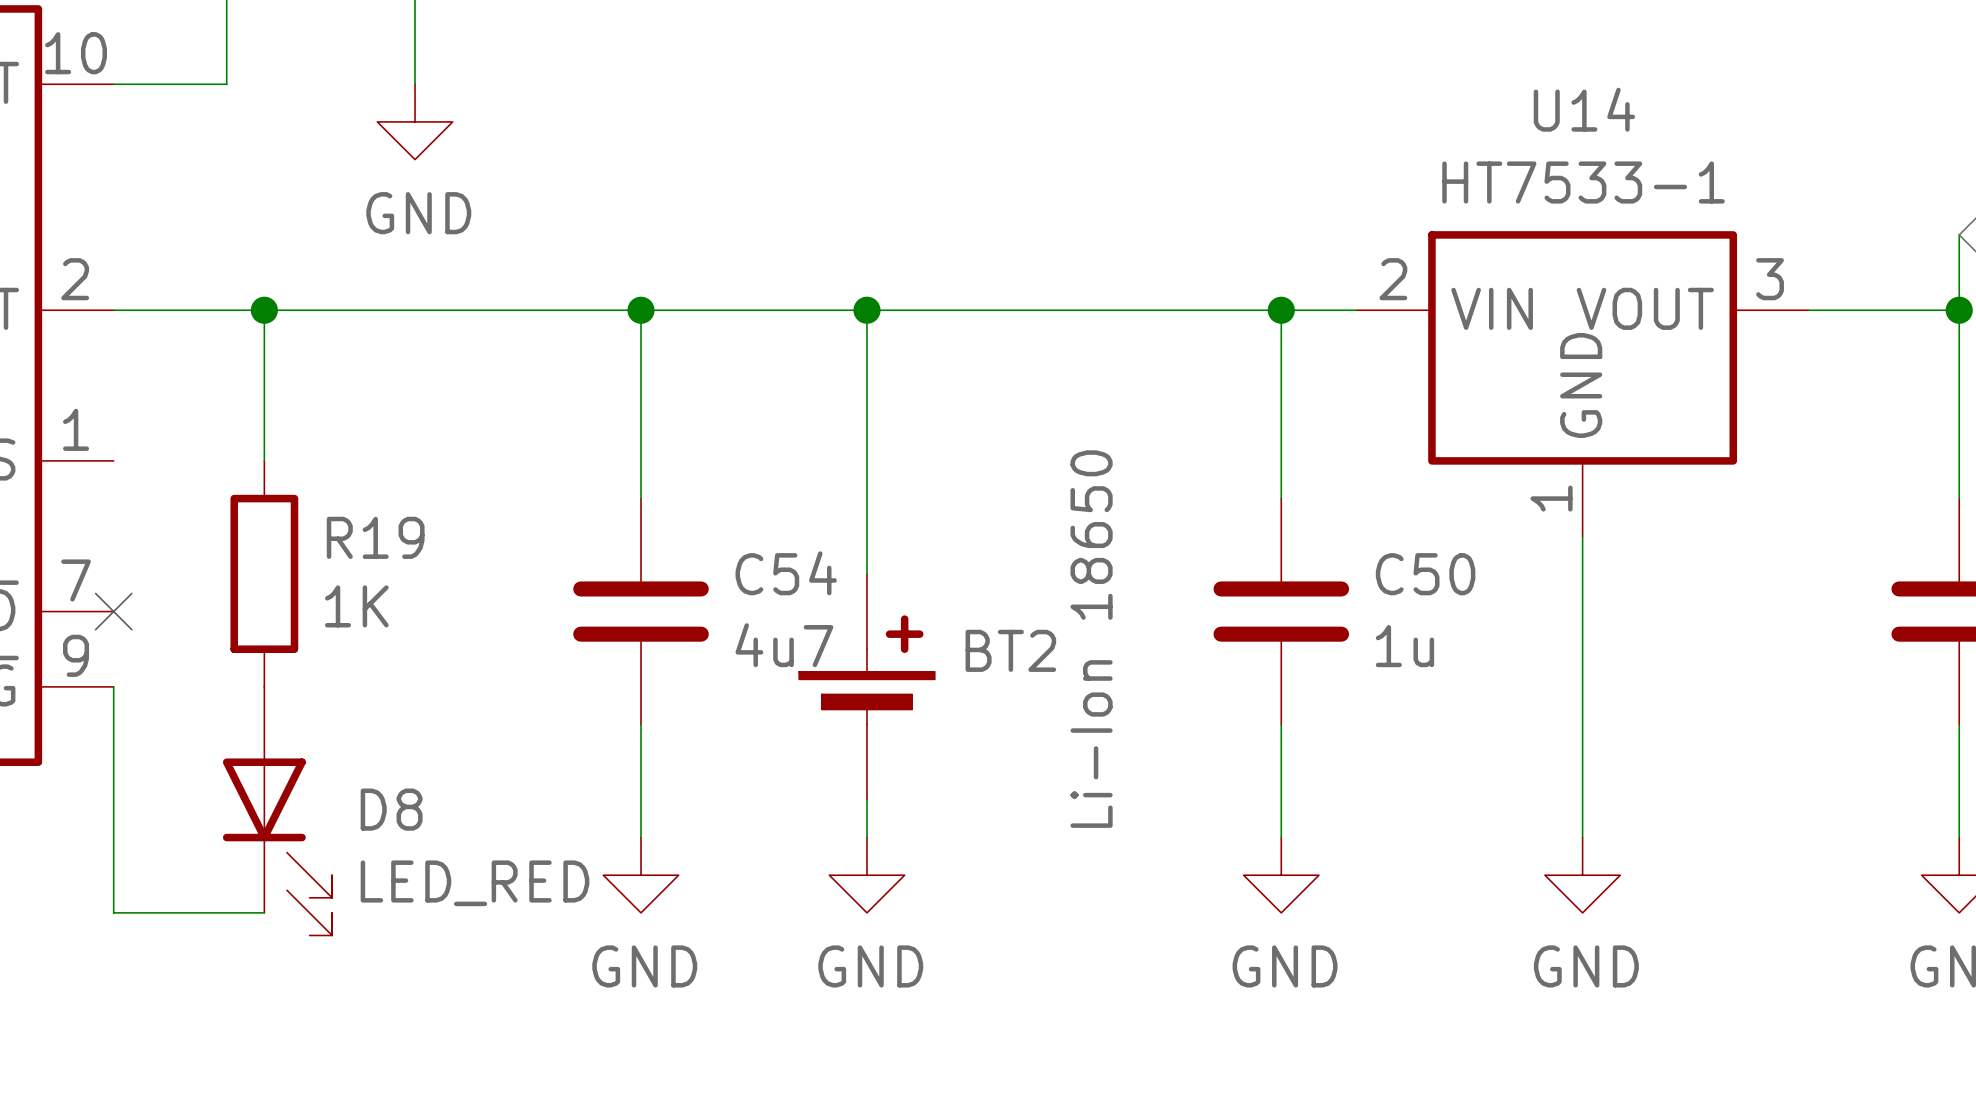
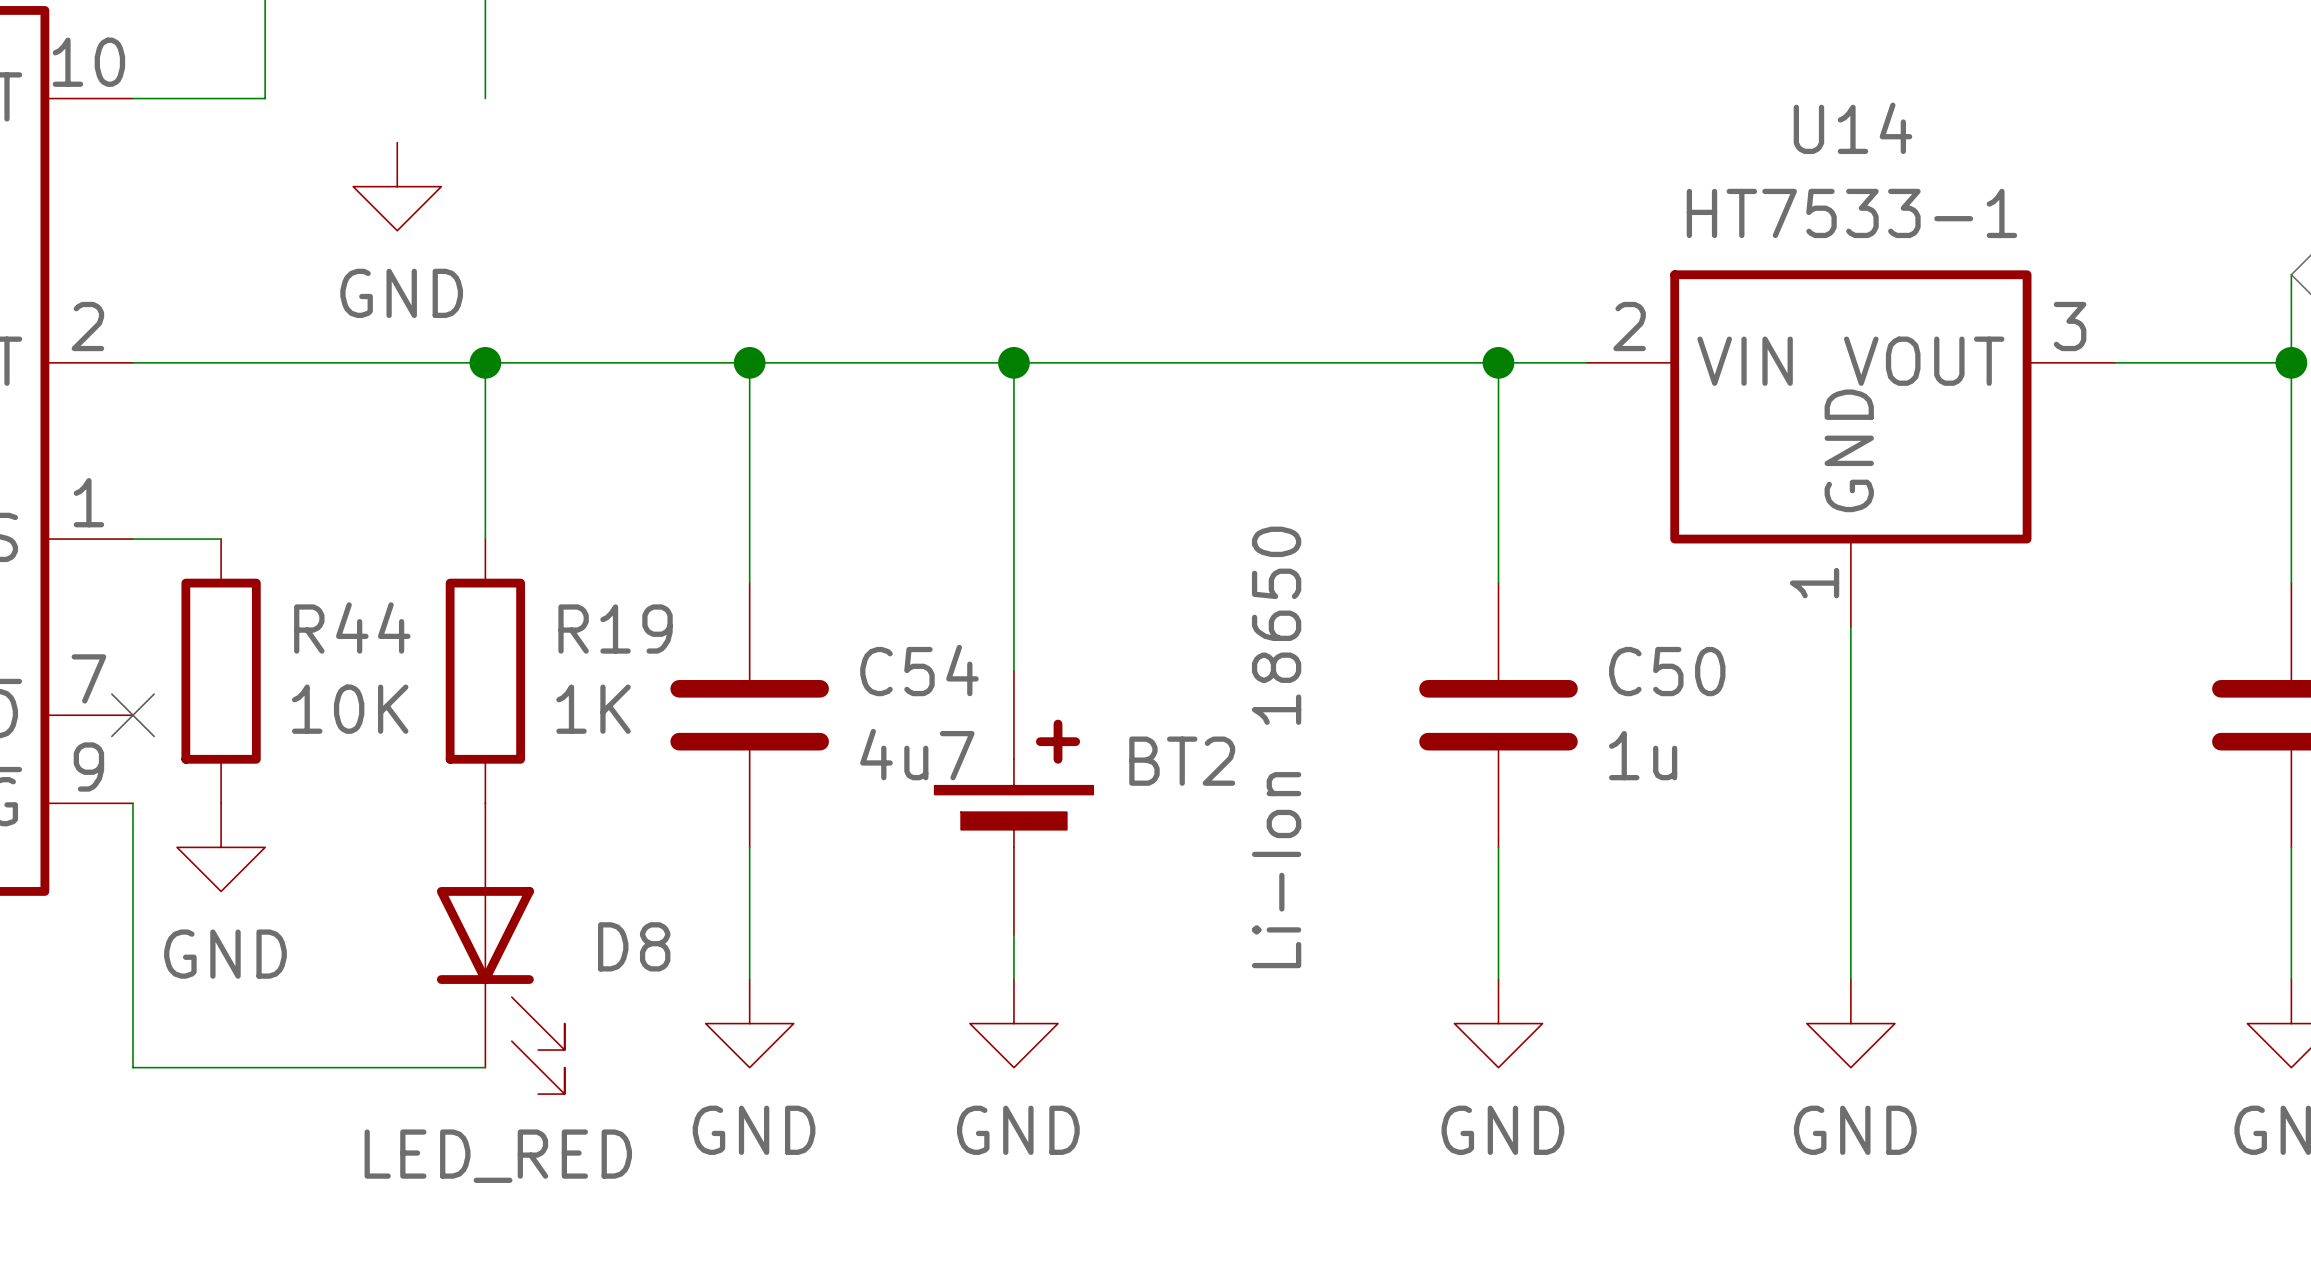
power symbol position: GND (415, 121) -> GND (397, 186)
wire: (264, 310) (264, 460) -> (485, 362) (485, 539)
junction position: (264, 310) -> (485, 362)
wire: none -> (132, 539) (221, 539)
R44: none -> 10K (221, 671)
R19 position: (264, 573) -> (485, 671)
power symbol: none -> GND (221, 847)
D8 position: (277, 811) -> (500, 948)
D8 value position: LED_RED (475, 883) -> LED_RED (498, 1156)
wire: none -> (309, 1067) (485, 1067)

